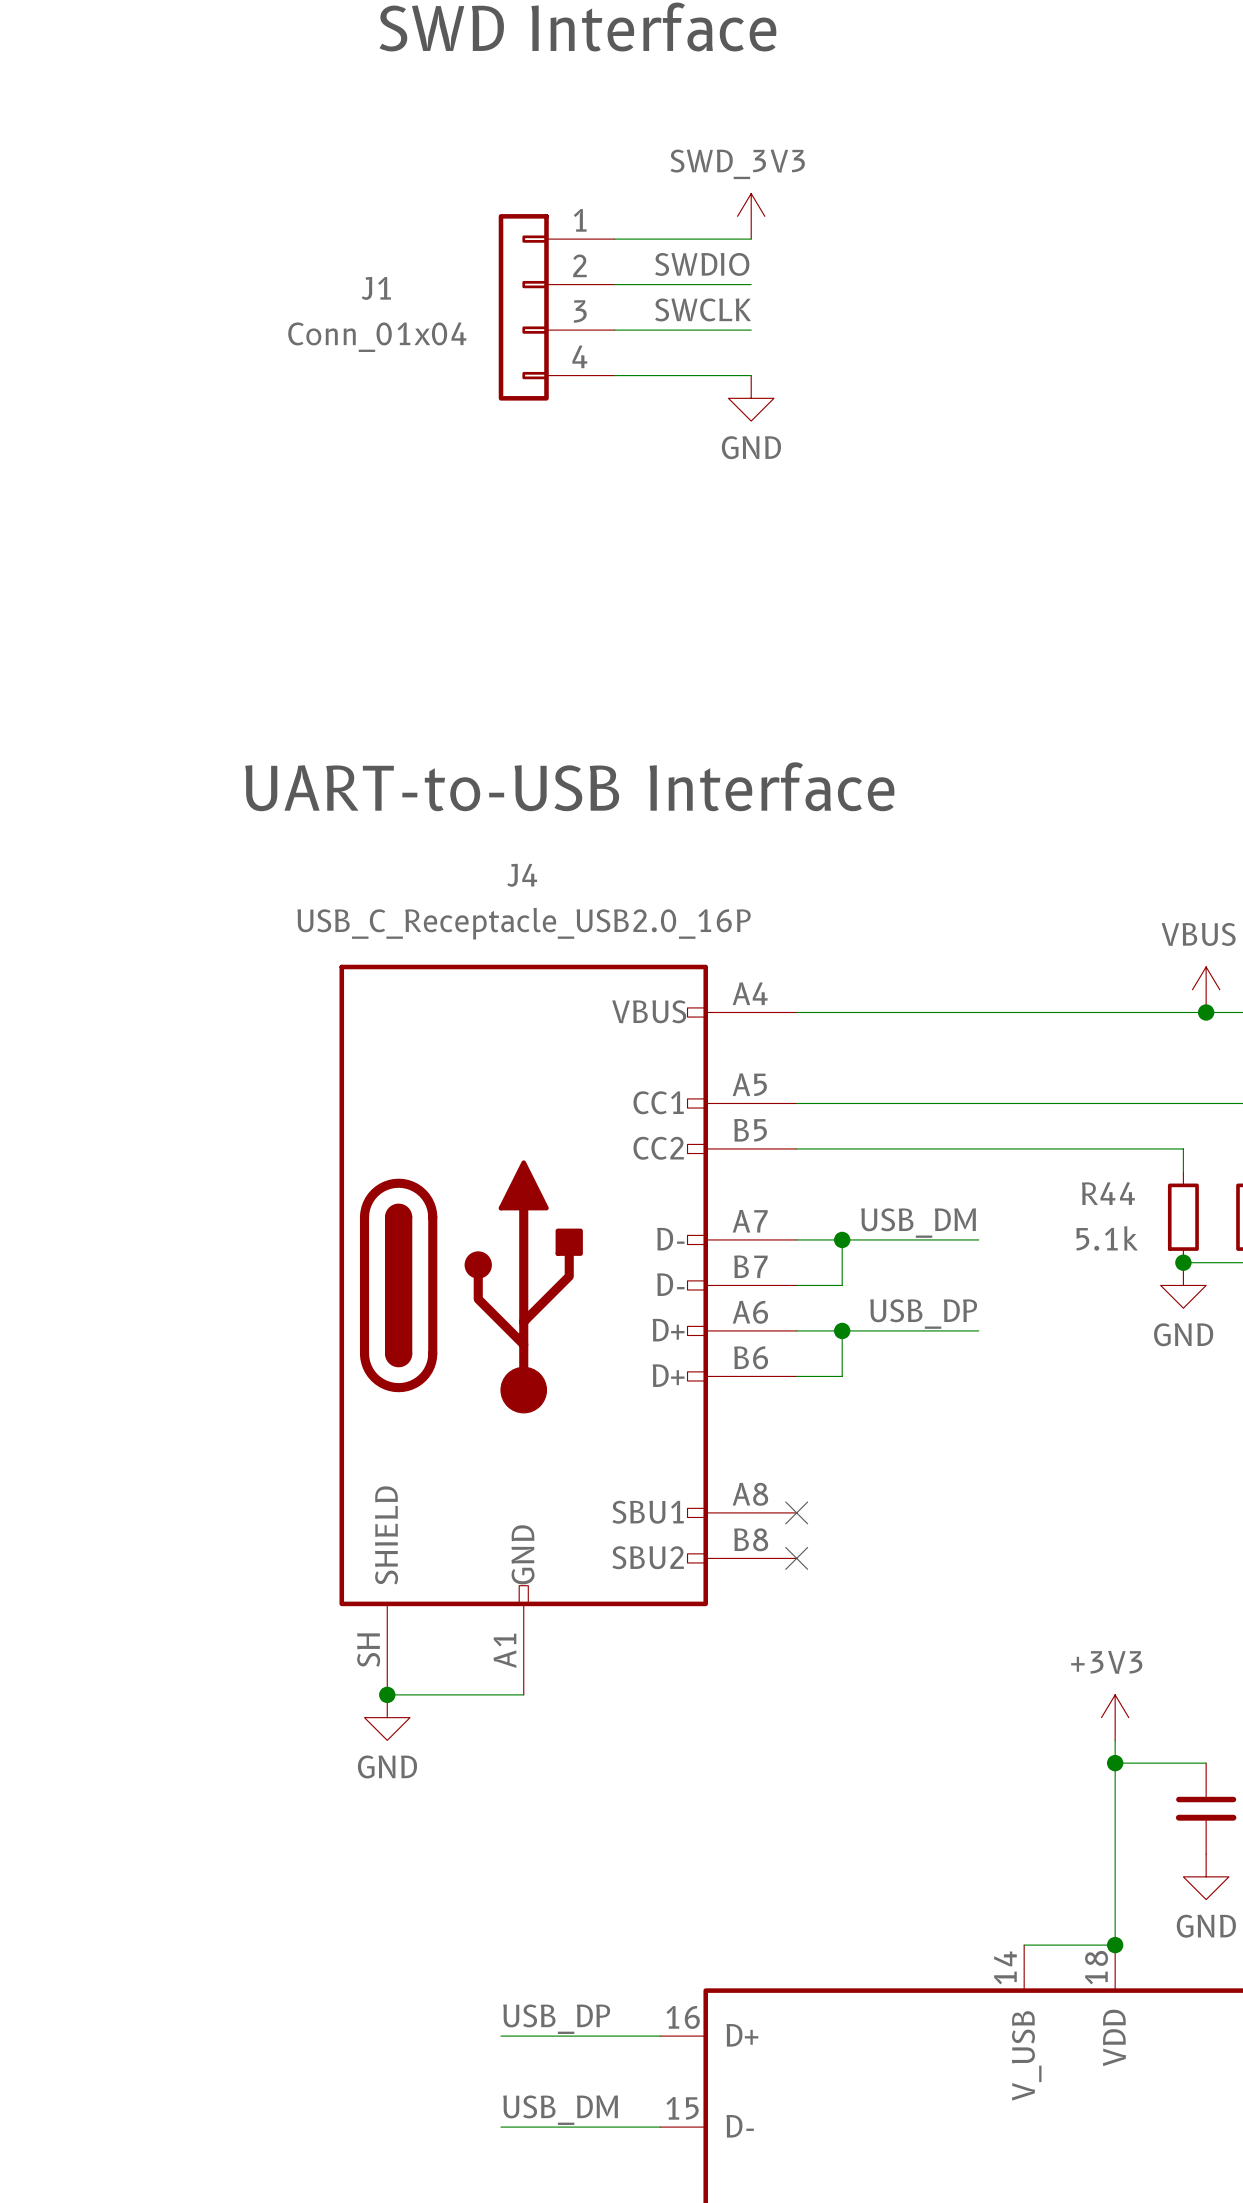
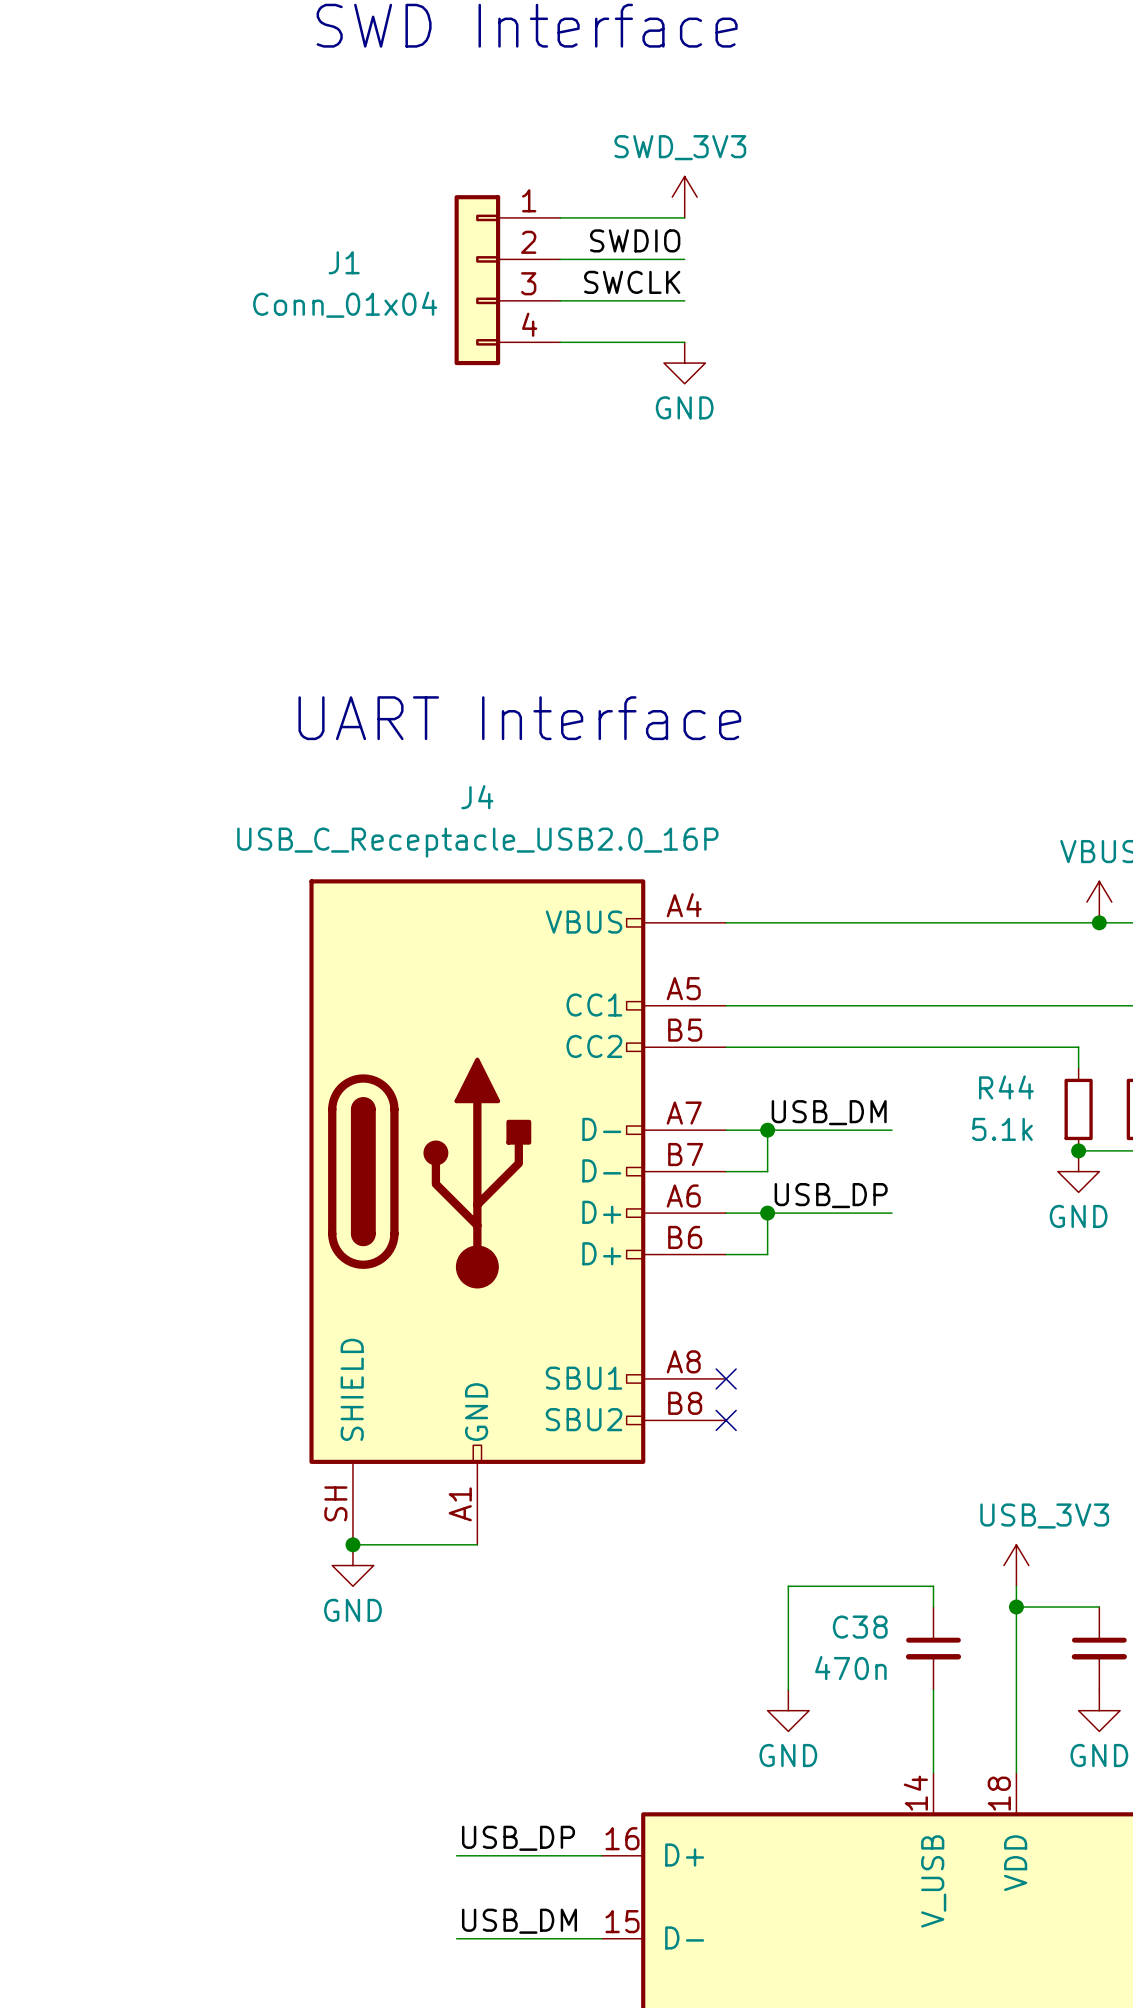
text: UART-to-USB Interface (569, 786) -> UART Interface (519, 718)
power symbol: +3V3 (1115, 1717) -> USB_3V3 (1016, 1565)
wire: none -> (933, 1607) (933, 1586) (788, 1586) (788, 1689)
C38: none -> 470n (933, 1648)
power symbol: none -> GND (788, 1710)
wire: (1024, 1945) (1115, 1945) -> (933, 1772) (933, 1689)
junction: (1115, 1945) -> none

